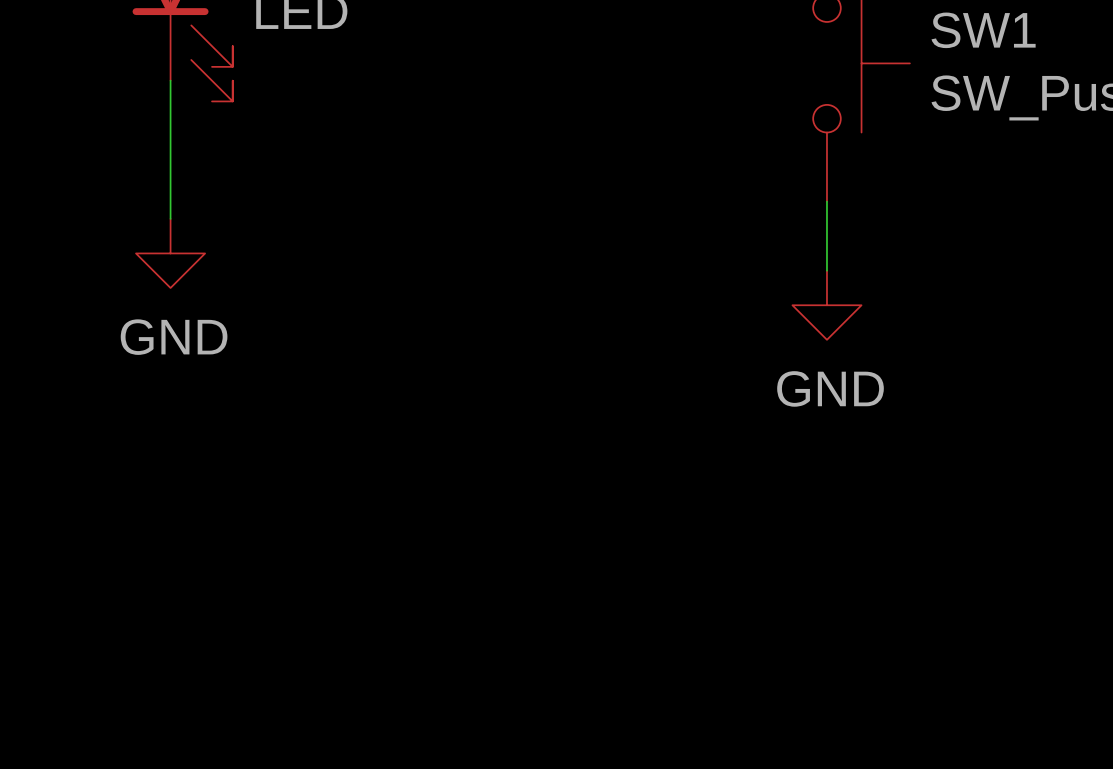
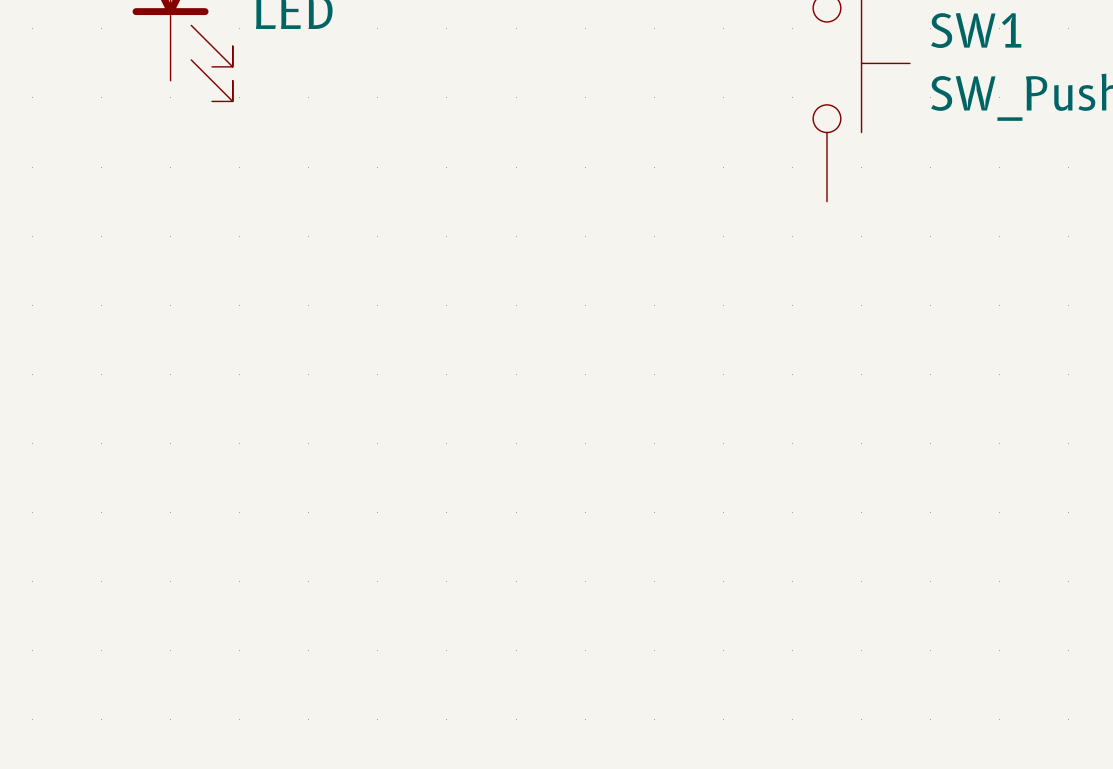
wire: (170, 80) (170, 218) -> none
wire: (826, 201) (826, 270) -> none
power symbol: GND (170, 253) -> none
power symbol: GND (826, 305) -> none

